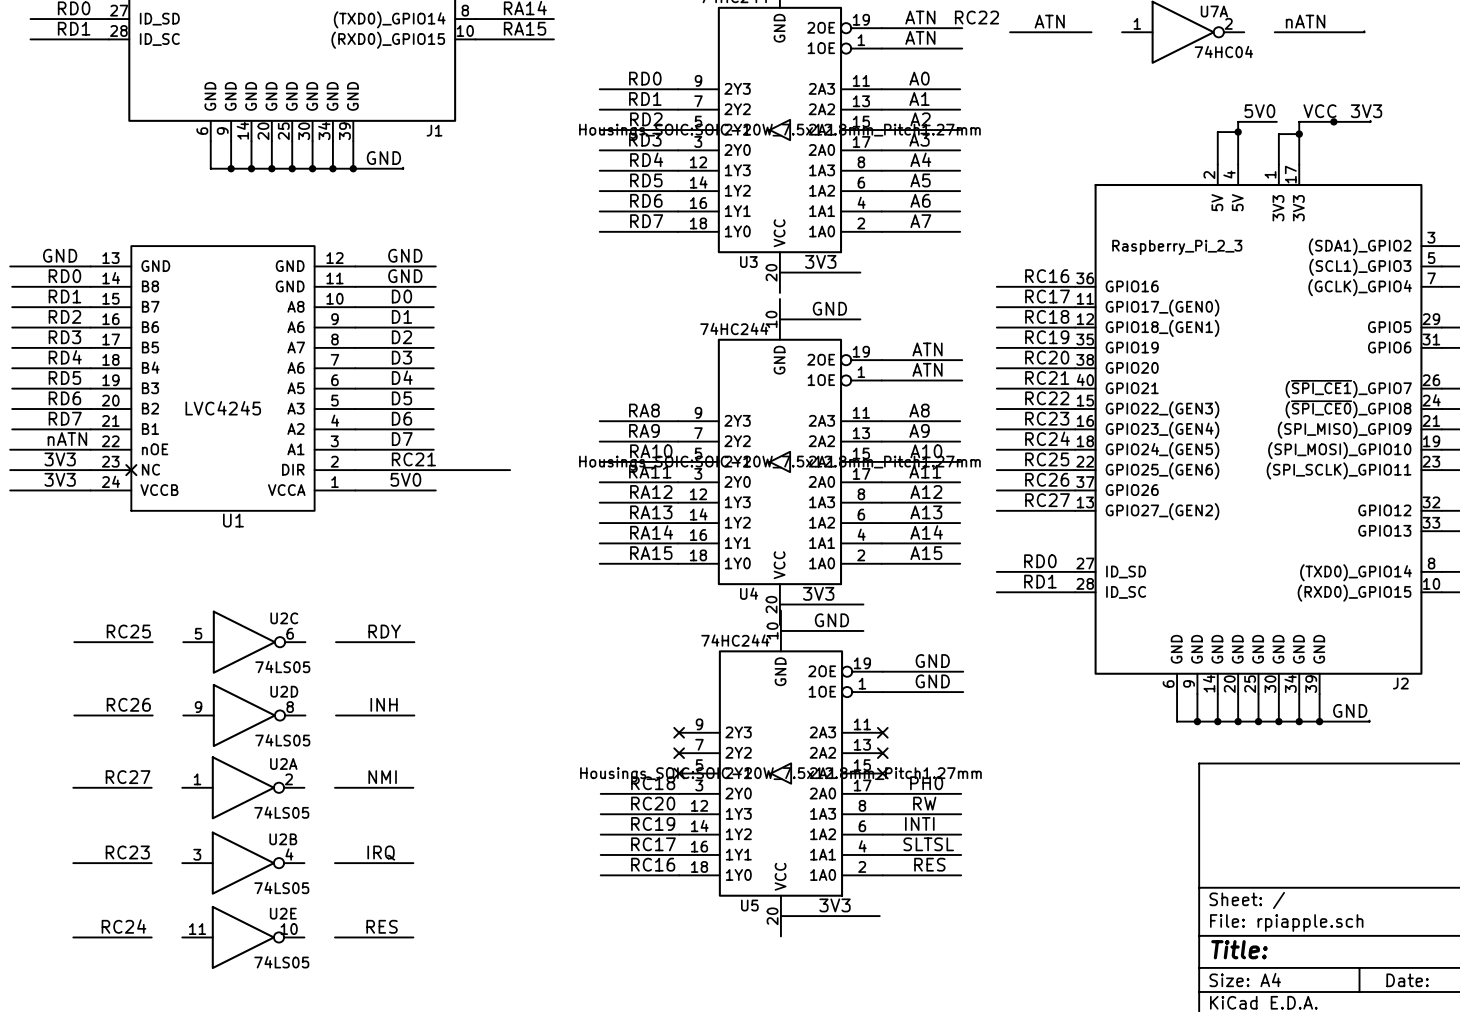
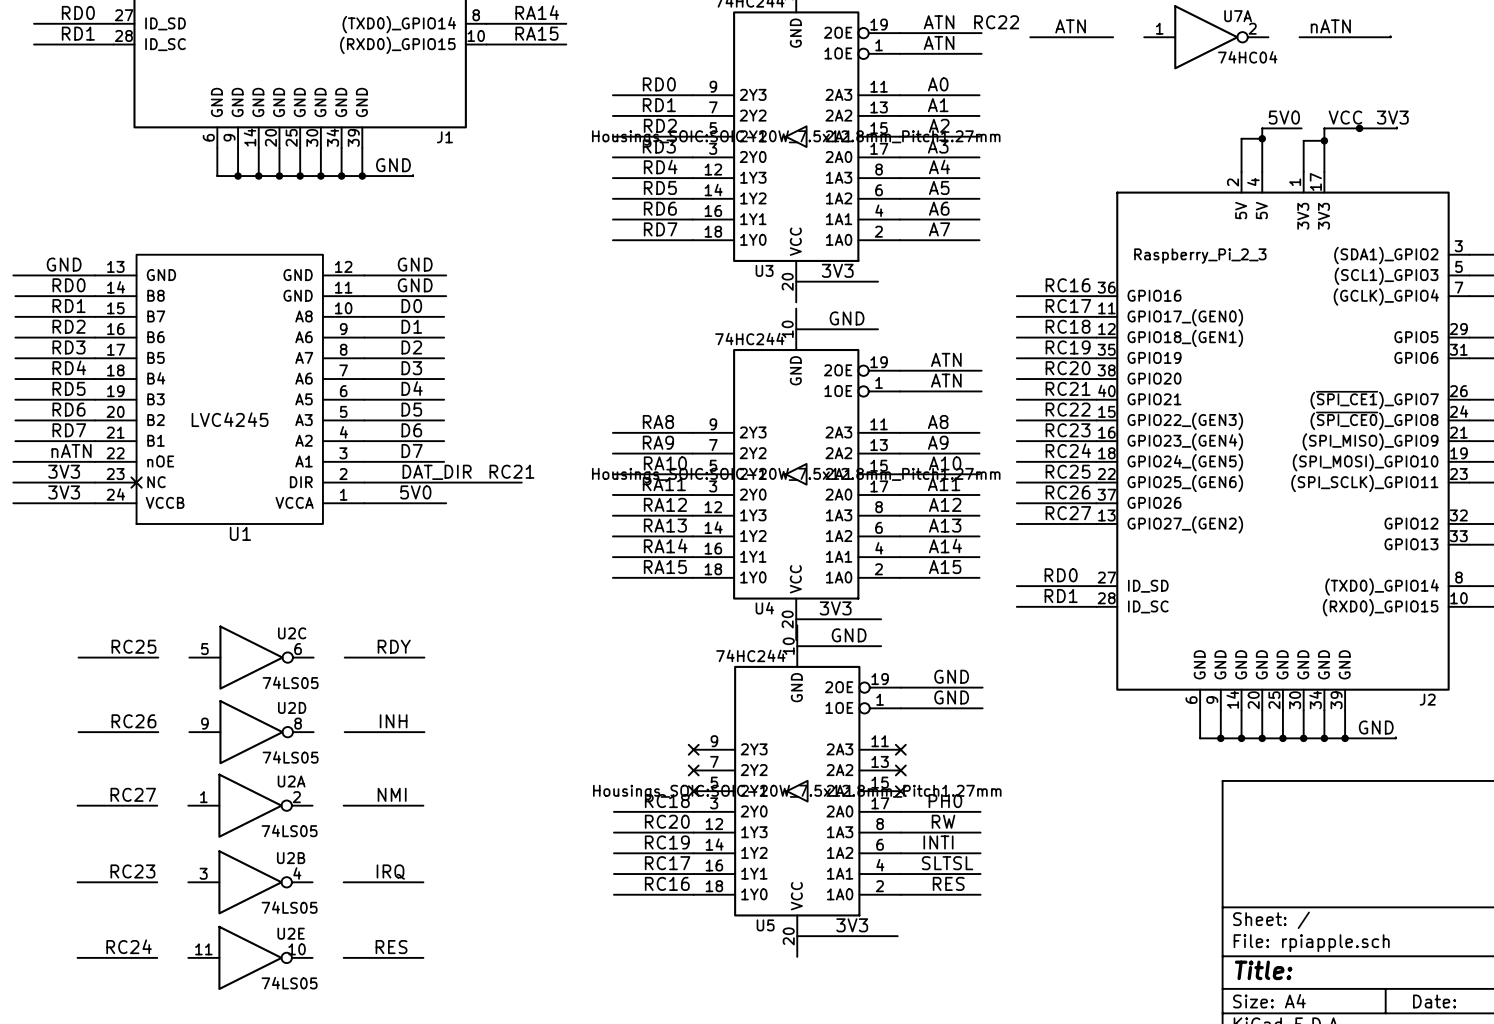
label position: RC21 (413, 459) -> RC21 (511, 471)
label: none -> DAT_DIR (437, 472)

